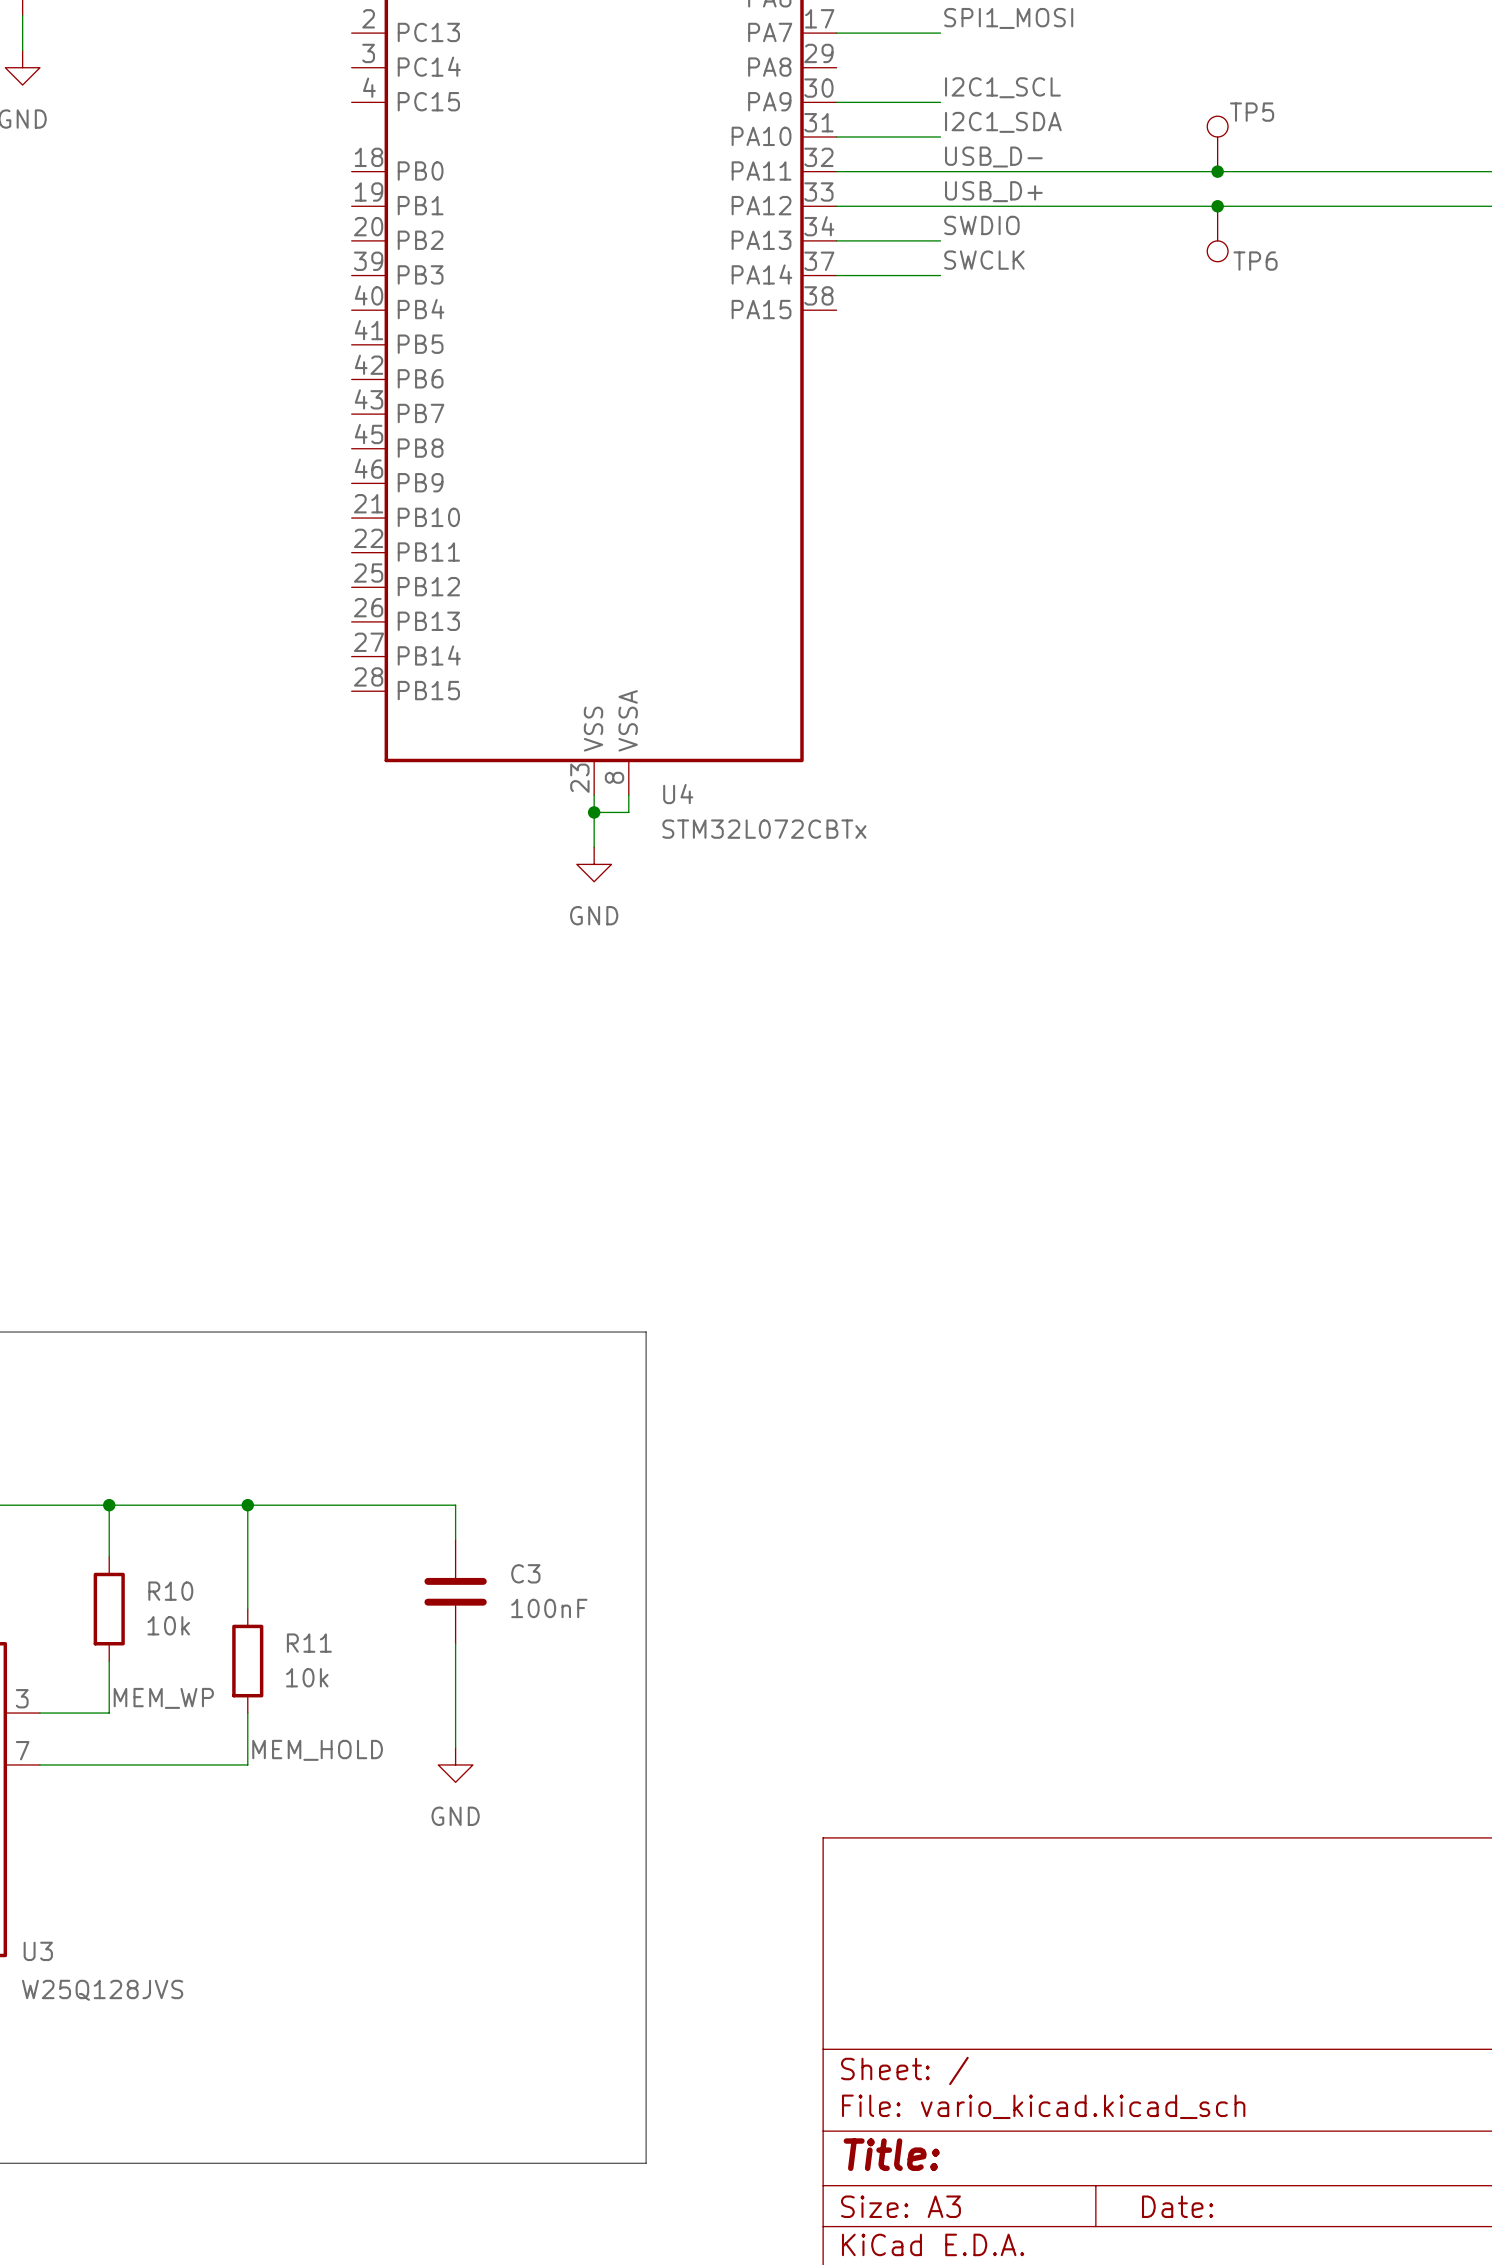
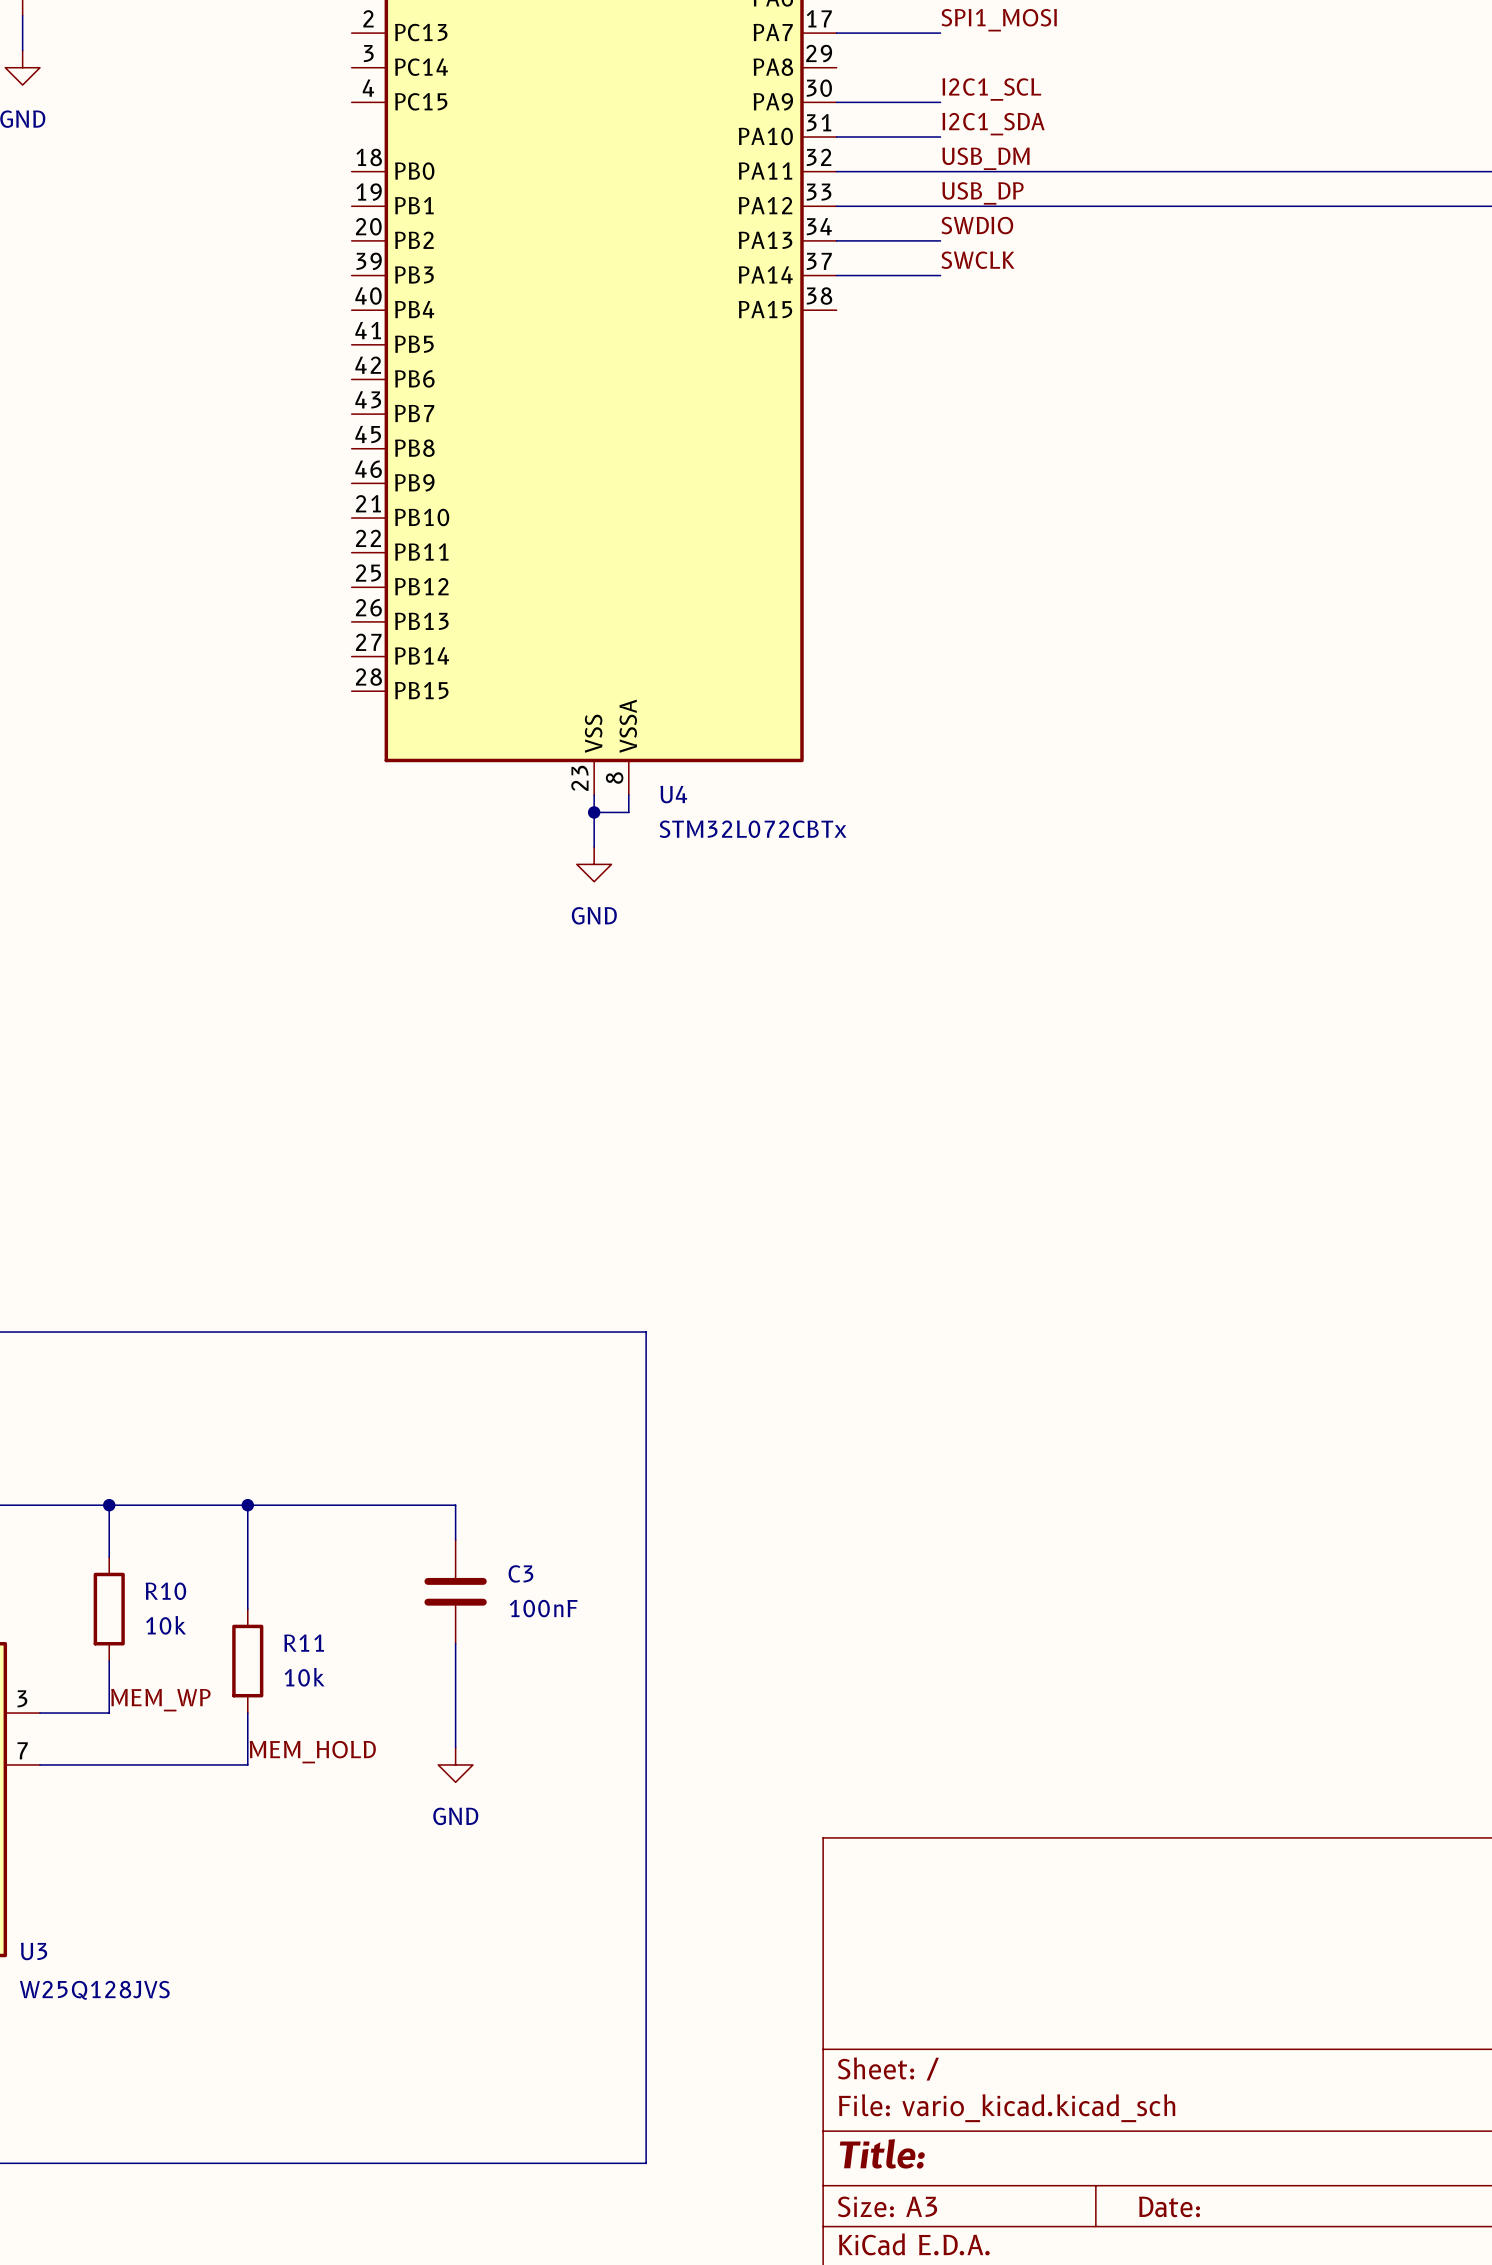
TP5: (1217, 143) -> none
label: USB_D- (993, 157) -> USB_DM (985, 158)
junction: (1217, 171) -> none
label: USB_D+ (993, 191) -> USB_DP (982, 193)
junction: (1217, 206) -> none
TP6: (1217, 233) -> none

